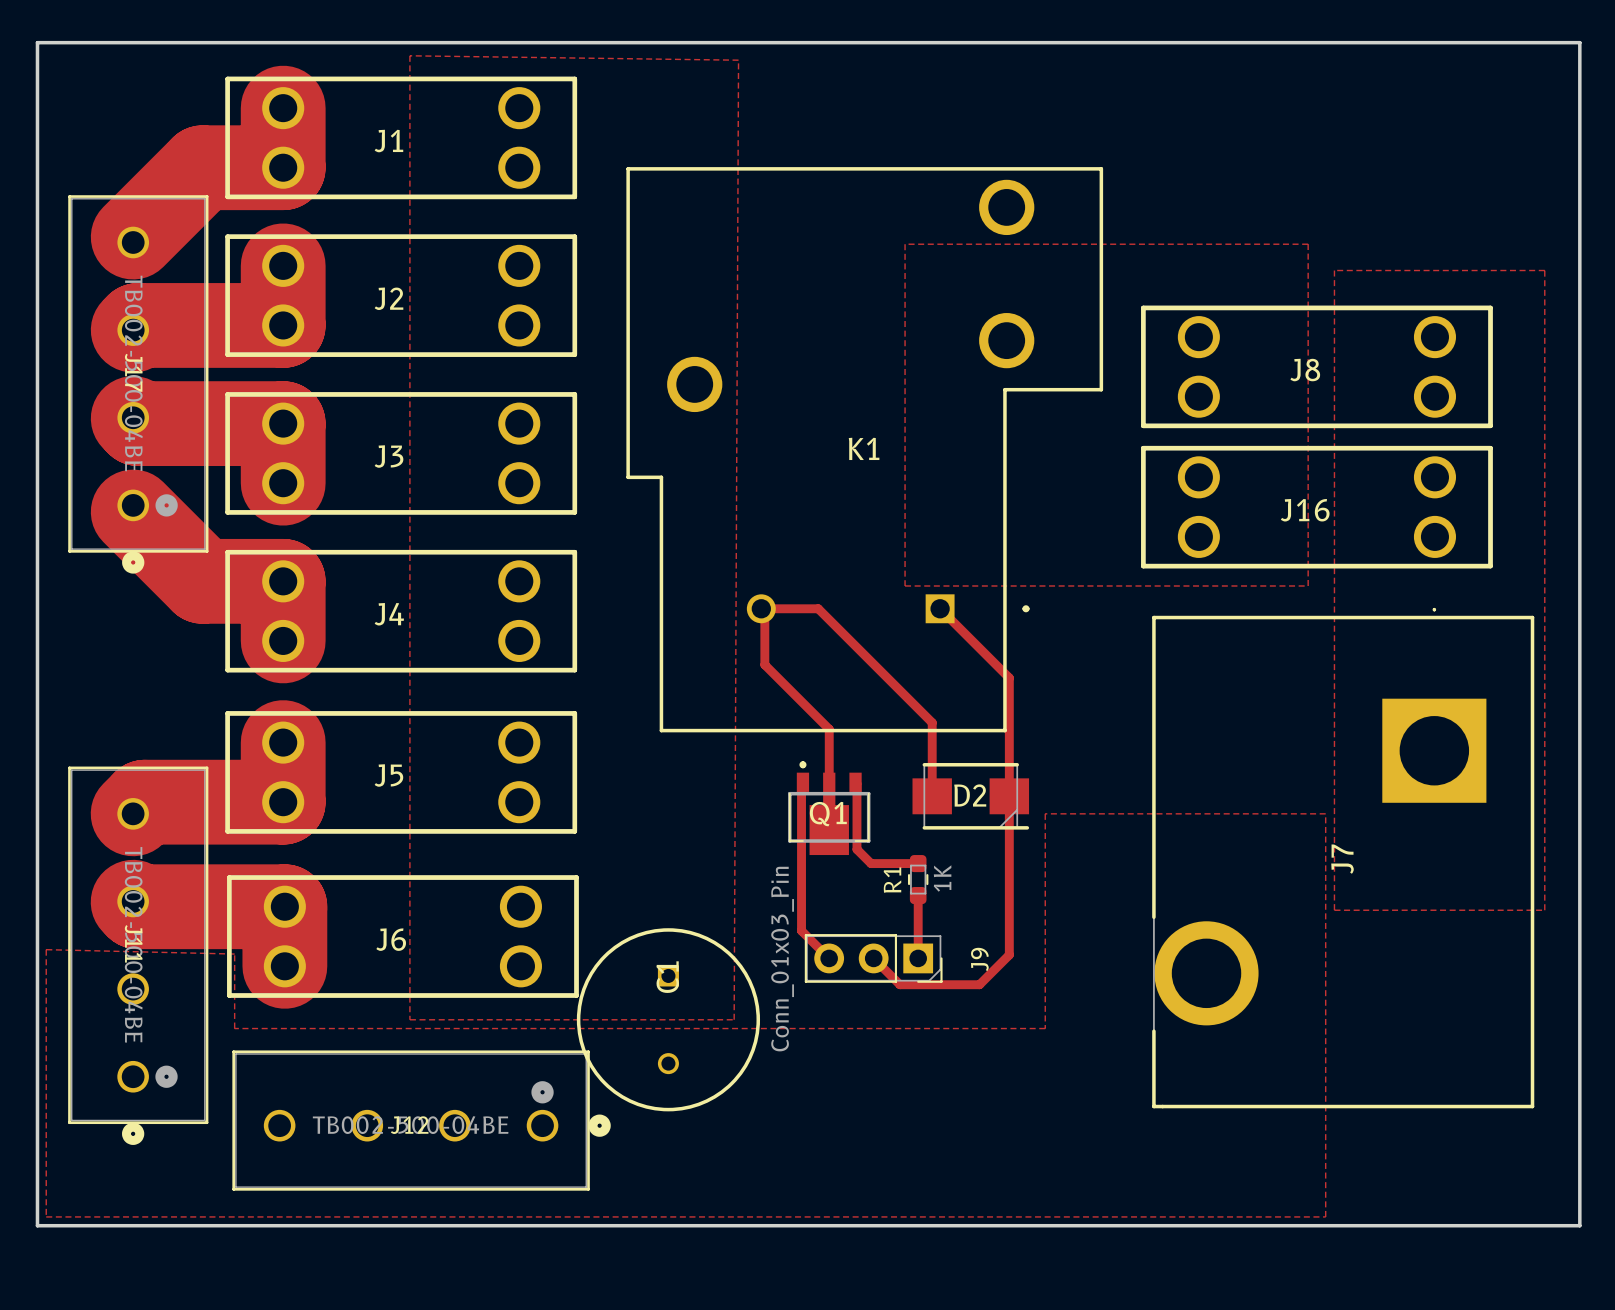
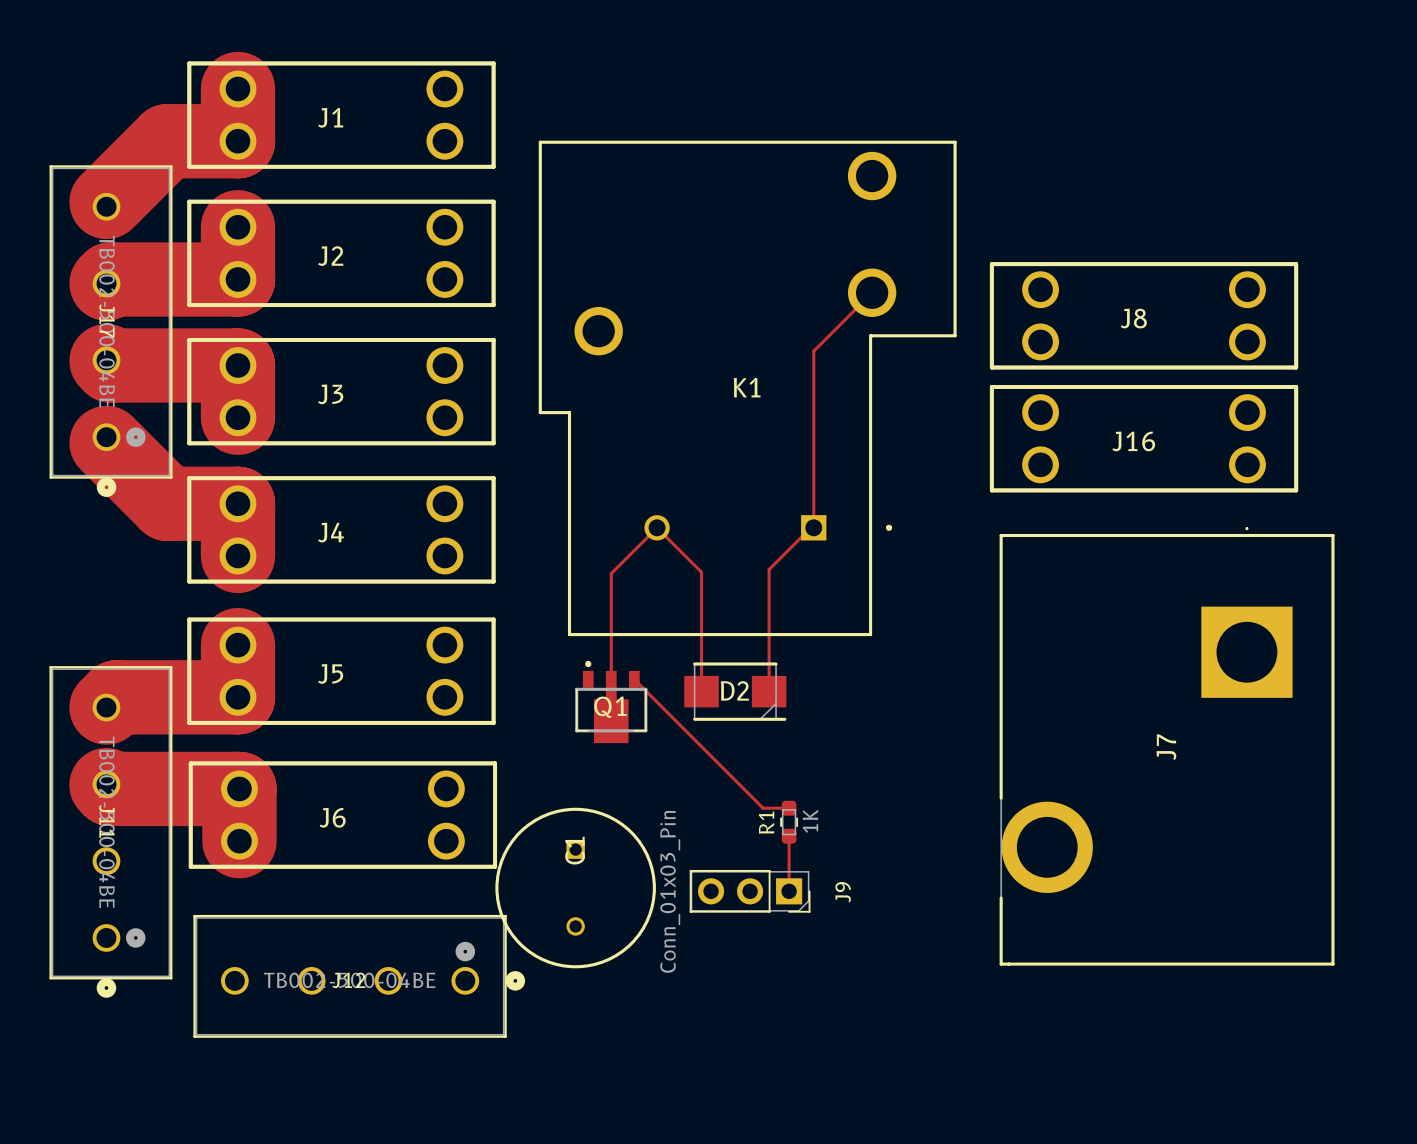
board edge: (37, 42) (1579, 42) (1579, 1225) (37, 1225) (37, 42) -> none
zone outline: (409, 55) (409, 1019) (734, 1019) (738, 60) (409, 55) -> none
zone outline: (905, 244) (905, 585) (1308, 585) (1308, 244) (905, 244) -> none
zone outline: (1334, 270) (1334, 910) (1544, 910) (1544, 270) (1334, 270) -> none
track: none -> (872, 292) (813, 351) (813, 527) (809, 527)
track: (761, 608) (818, 608) (932, 722) (932, 796) -> (657, 527) (611, 573) (611, 685)
track: none -> (810, 527) (769, 569) (769, 691)
track: (940, 608) (1009, 678) (1009, 954) (979, 984) (899, 984) (873, 958) -> none
track: (764, 612) (764, 664) (829, 729) (829, 788) -> (660, 530) (701, 572) (701, 691)
track: none -> (634, 679) (763, 808) (789, 808)
track: (802, 782) (801, 930) (829, 958) -> none
track: (855, 782) (856, 849) (871, 863) (918, 863) -> none
D2 position: (970, 796) -> (735, 691)
Q1 position: (829, 808) -> (611, 702)
zone outline: (1045, 813) (1325, 813) (1325, 1216) (46, 1216) (46, 949) (234, 954) (234, 1028) (1045, 1028) (1045, 813) -> none
R1 position: (918, 879) -> (789, 822)
track: (918, 895) (918, 958) -> (789, 836) (789, 891)
J9 position: (873, 958) -> (750, 891)

